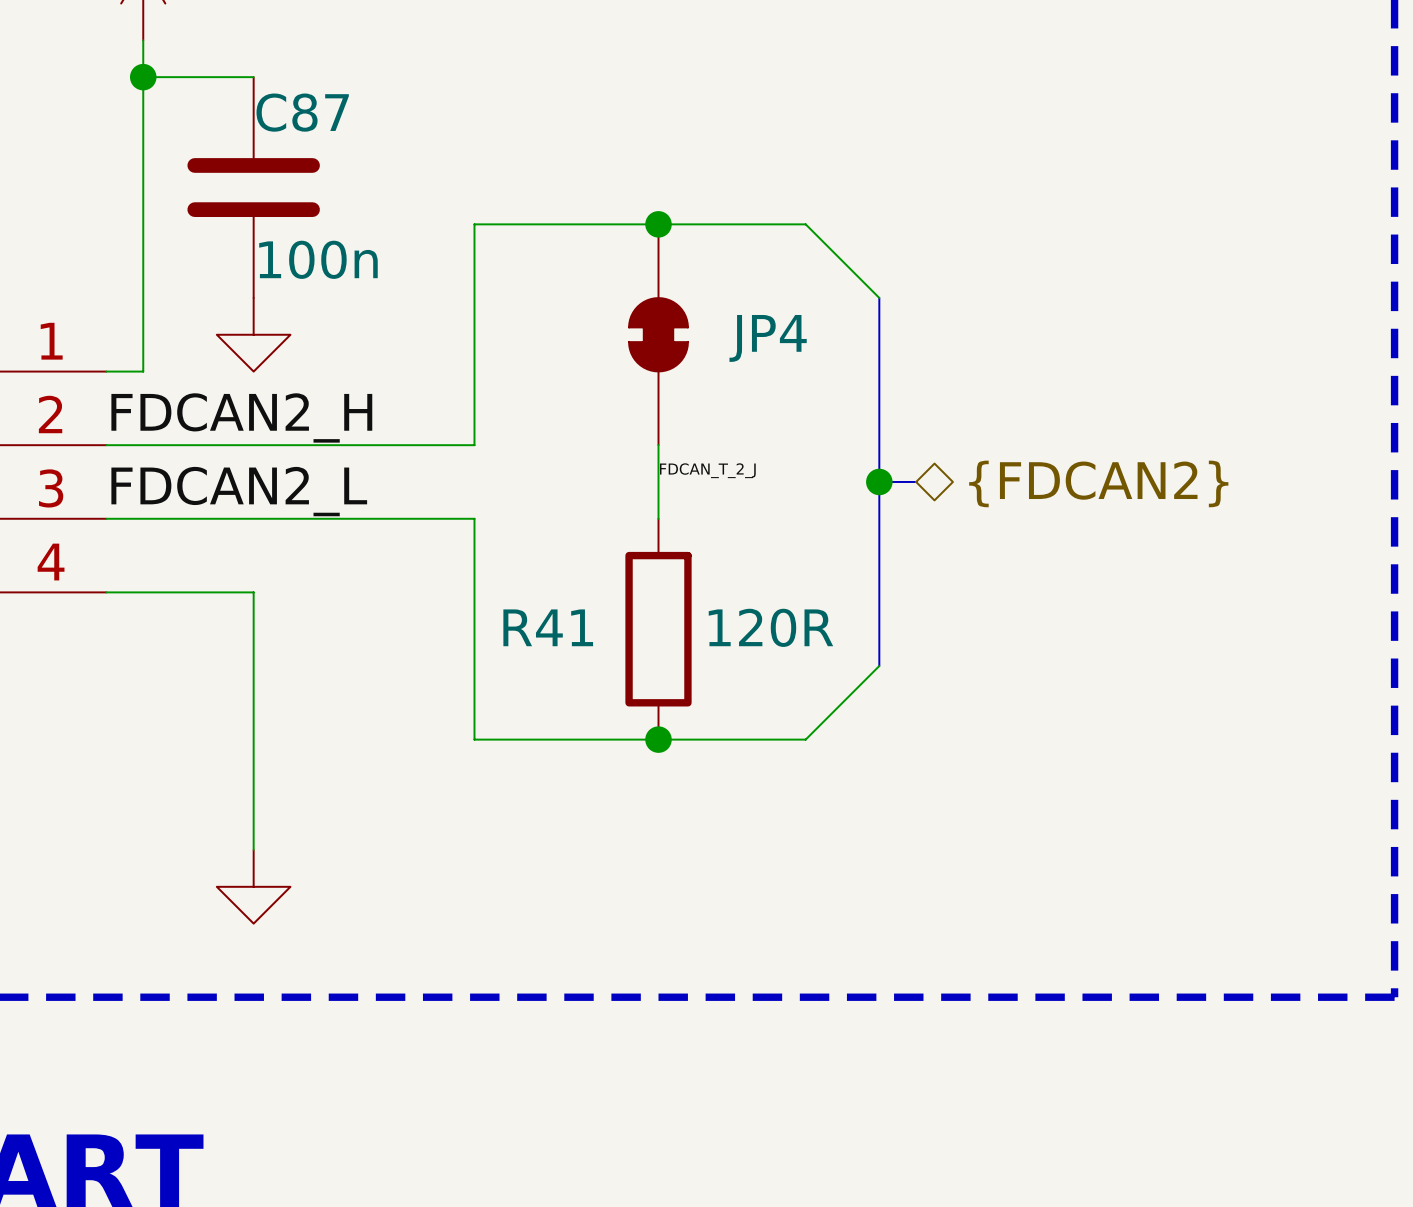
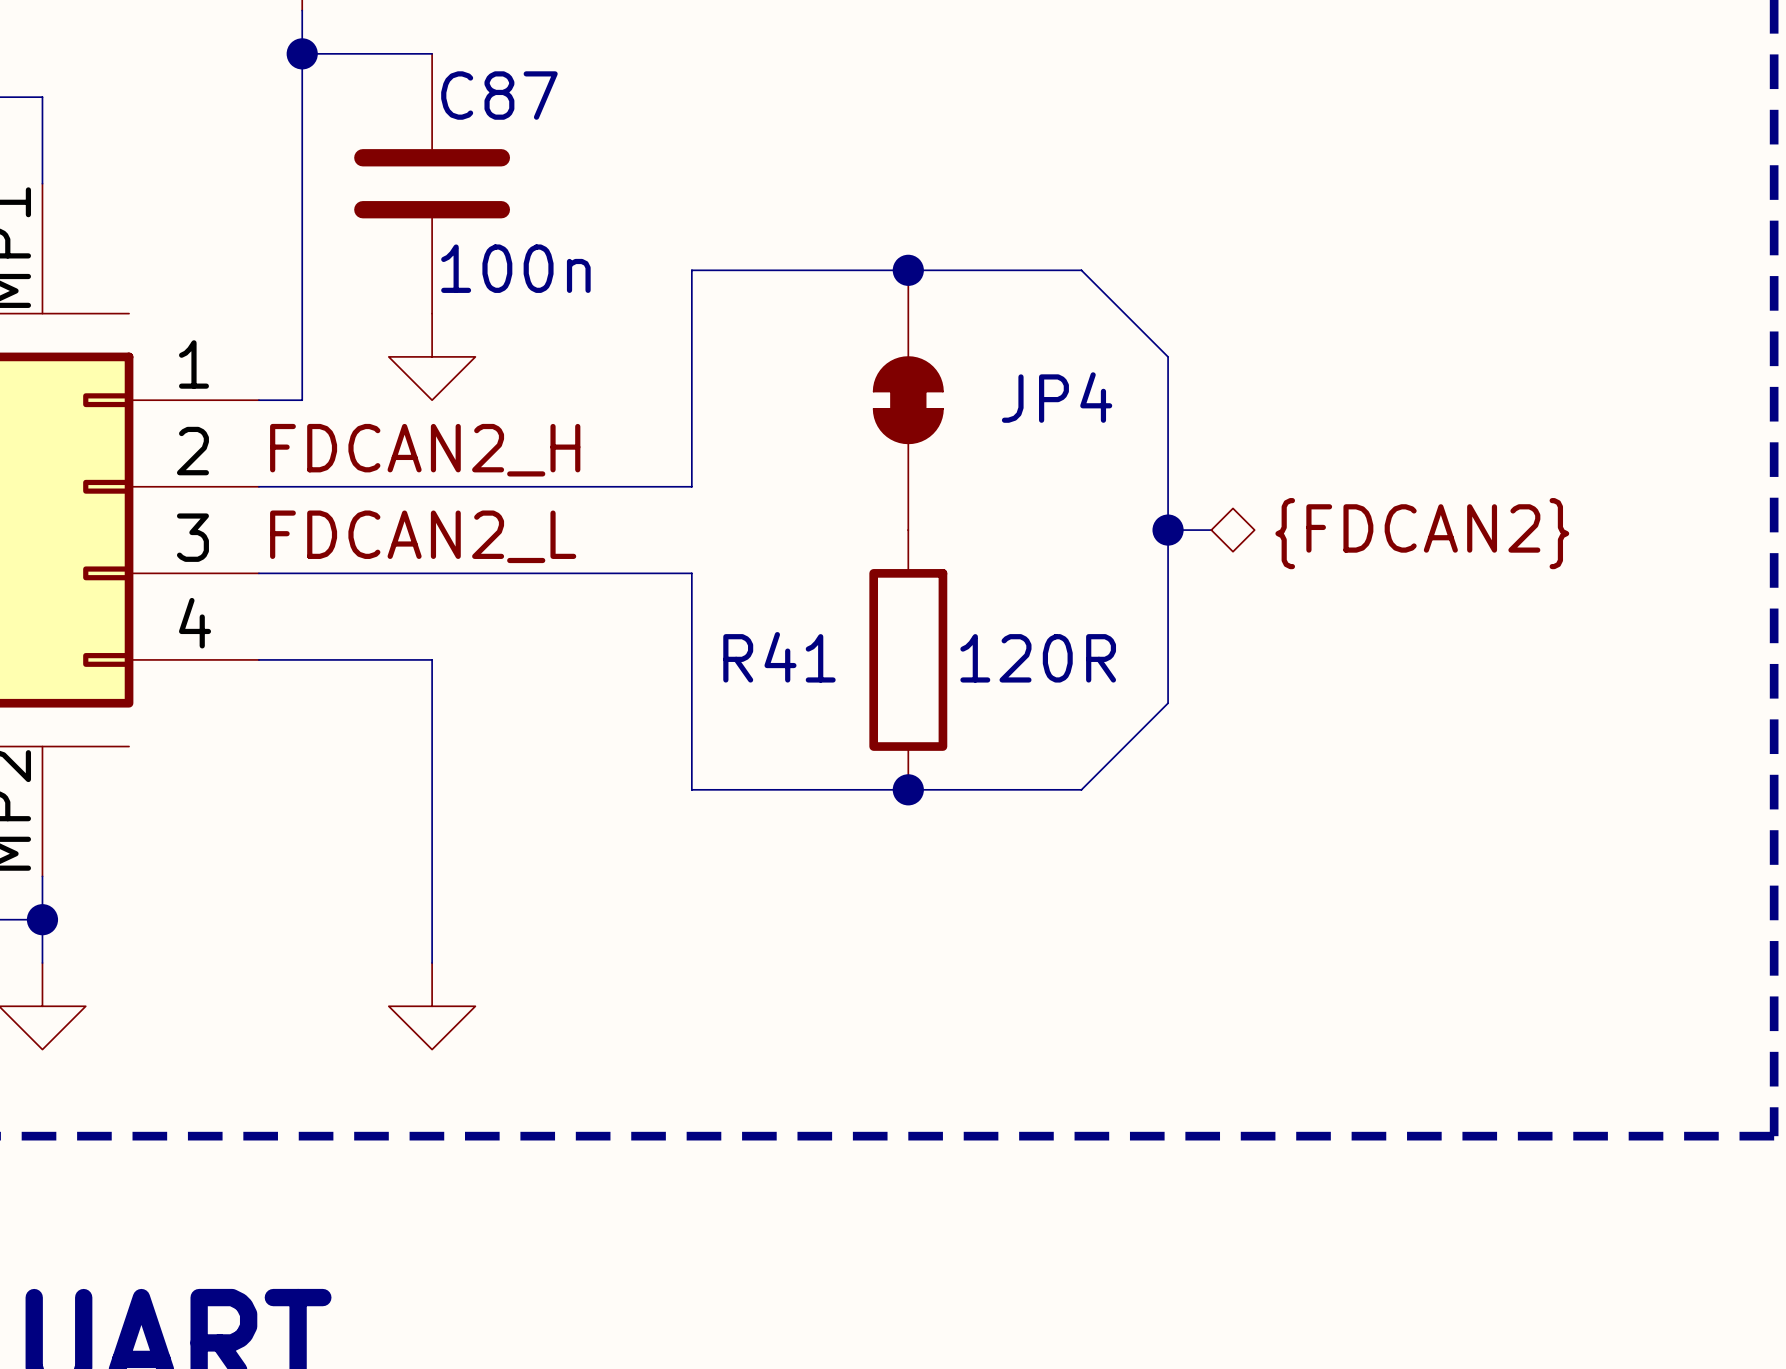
junction position: (658, 224) -> (908, 270)
wire: (474, 261) (474, 224) (805, 224) (879, 297) -> (691, 270) (1081, 270) (1168, 356)
bus: (879, 297) (879, 334) -> none
JP4 position: (658, 334) -> (908, 400)
label: FDCAN_T_2_J (707, 470) -> none
R41 position: (658, 629) -> (908, 659)
bus: (879, 629) (879, 666) -> none
wire: (879, 666) (805, 739) (474, 739) (474, 702) -> (1168, 703) (1081, 789) (691, 789)
junction position: (658, 739) -> (908, 789)

